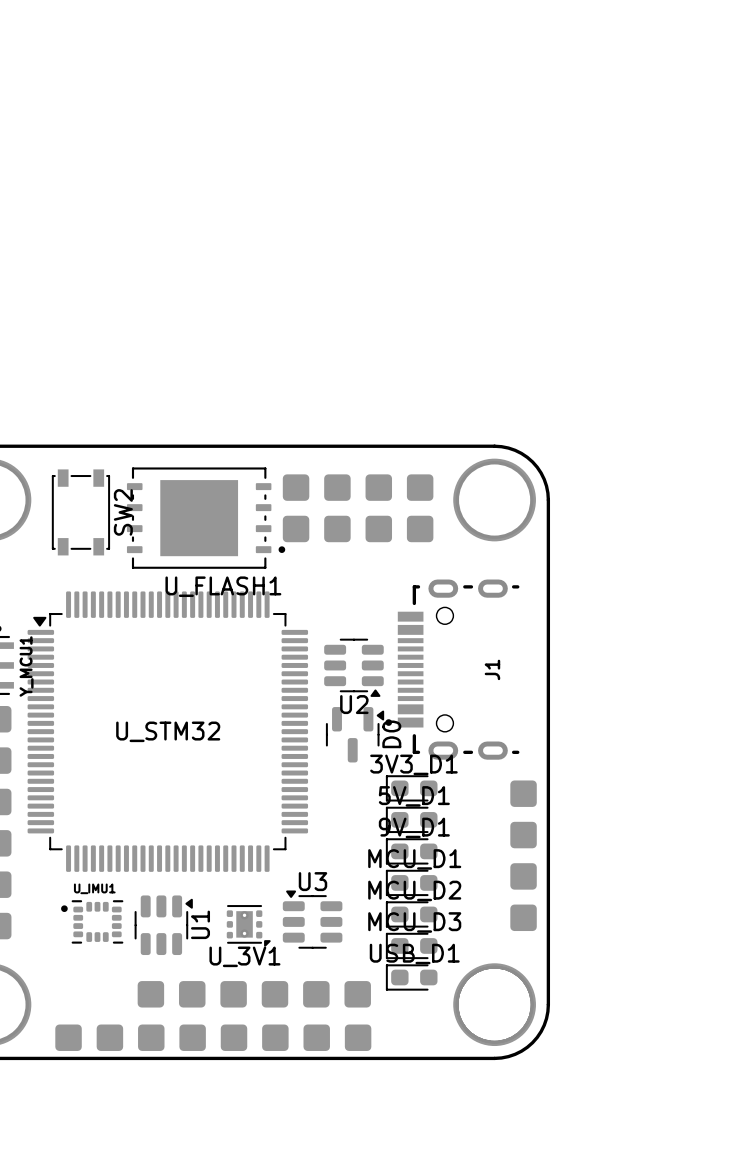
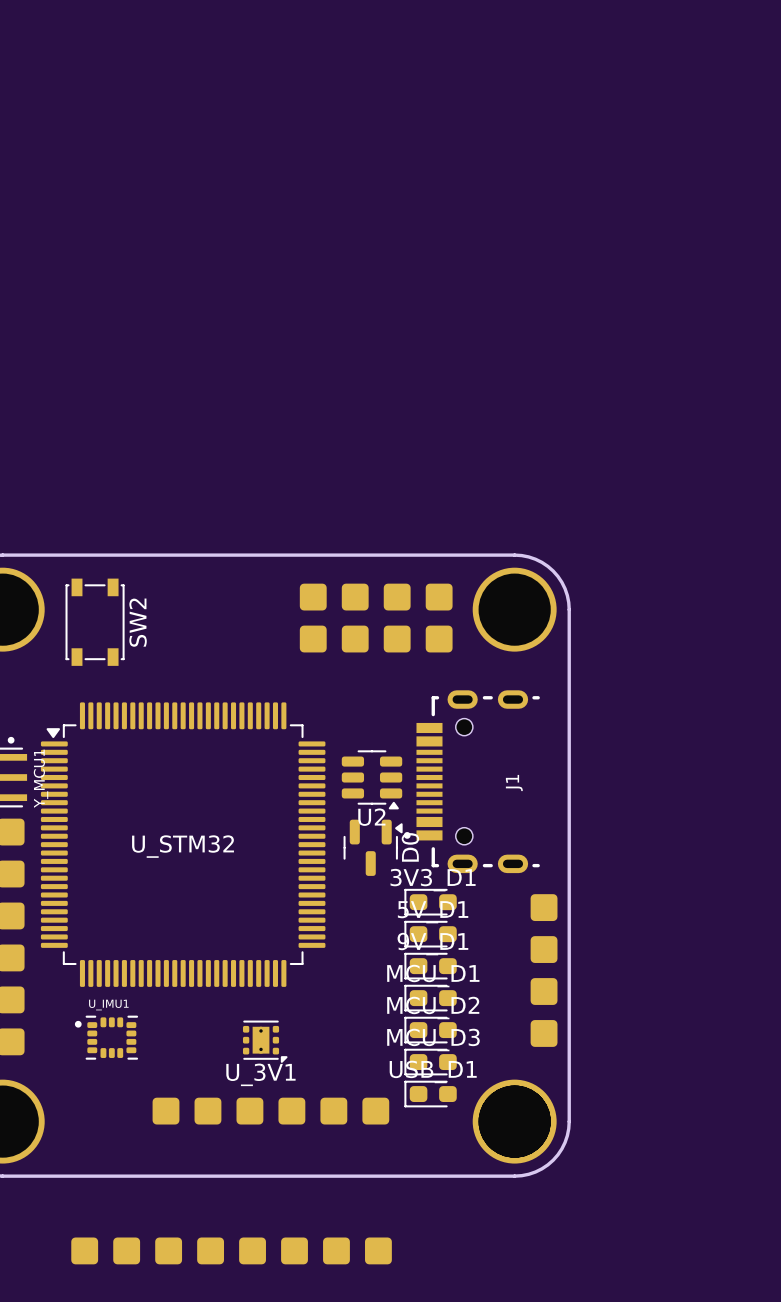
U_FLASH1: (206, 518) -> none
U3: (312, 919) -> none
U1: (163, 925) -> none
part position: (213, 1037) -> (231, 1250)

